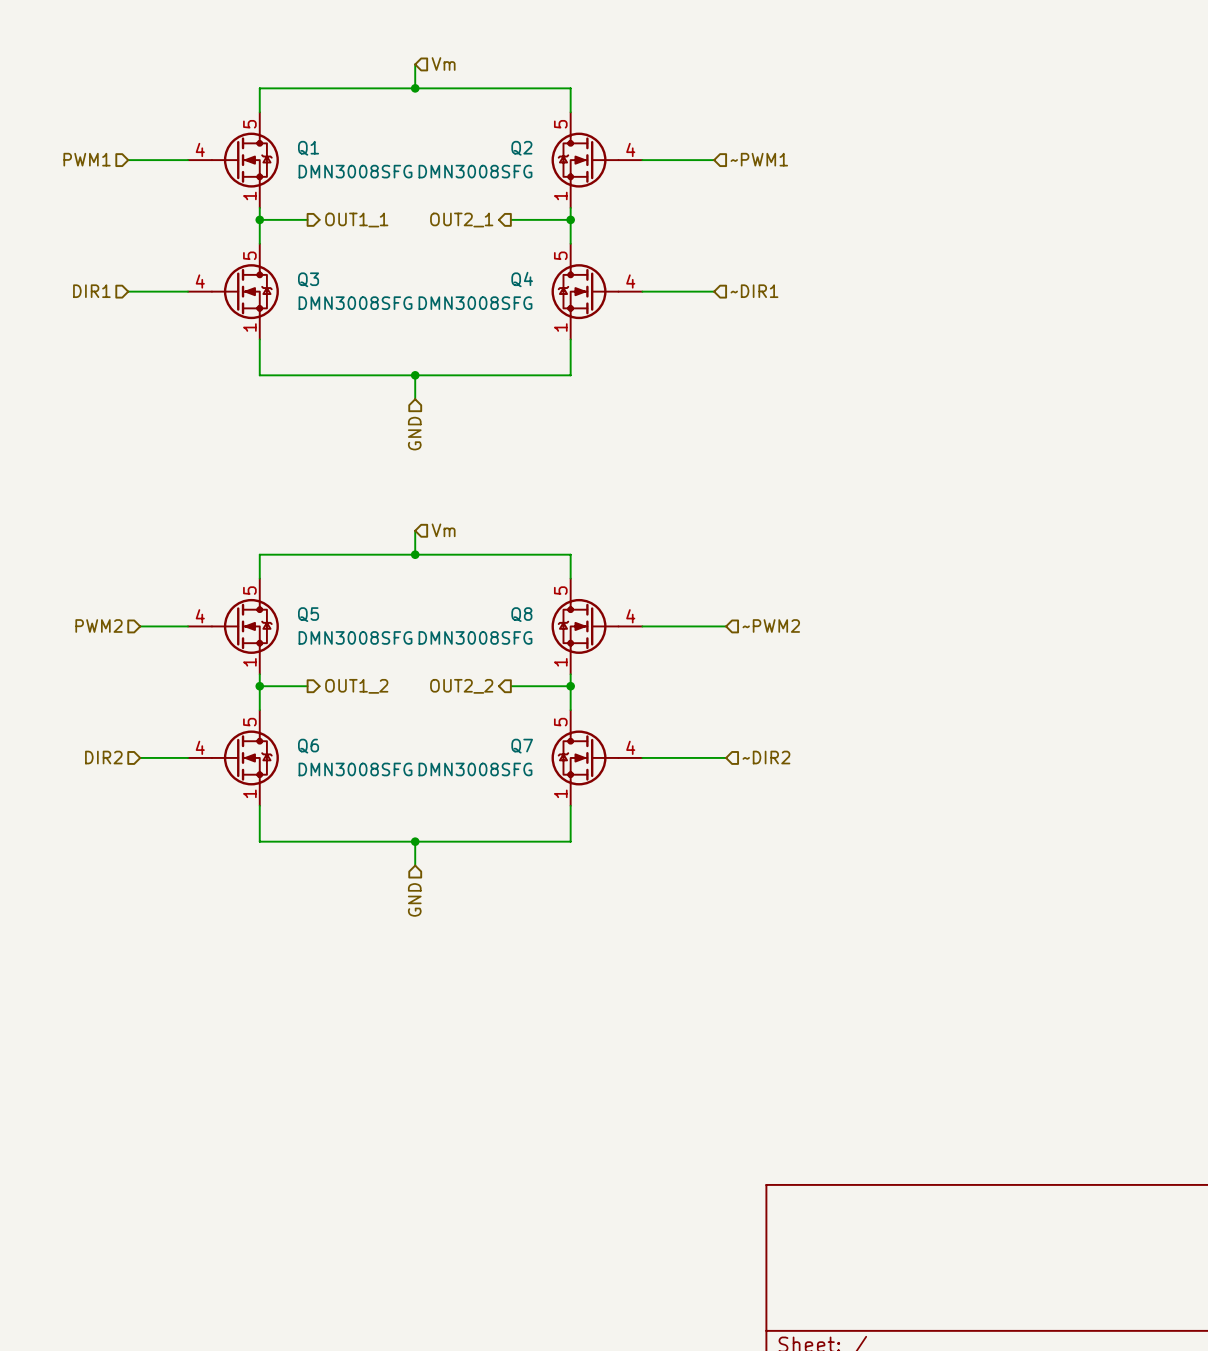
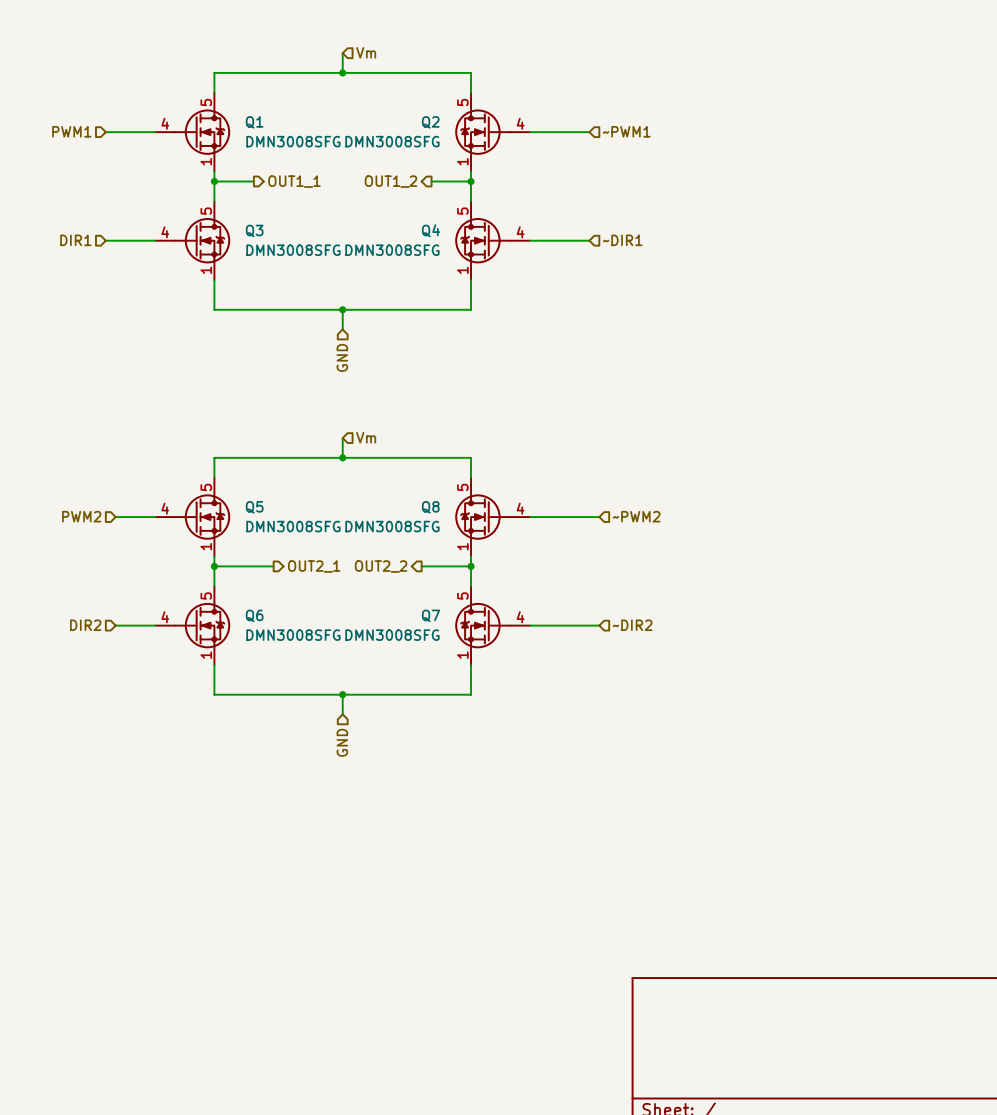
wire: (510, 219) (522, 219) -> none
hierarchical label: OUT2_1 (461, 220) -> OUT1_2 (390, 181)
wire: none -> (253, 566) (273, 566)
hierarchical label: OUT1_2 (356, 686) -> OUT2_1 (314, 566)

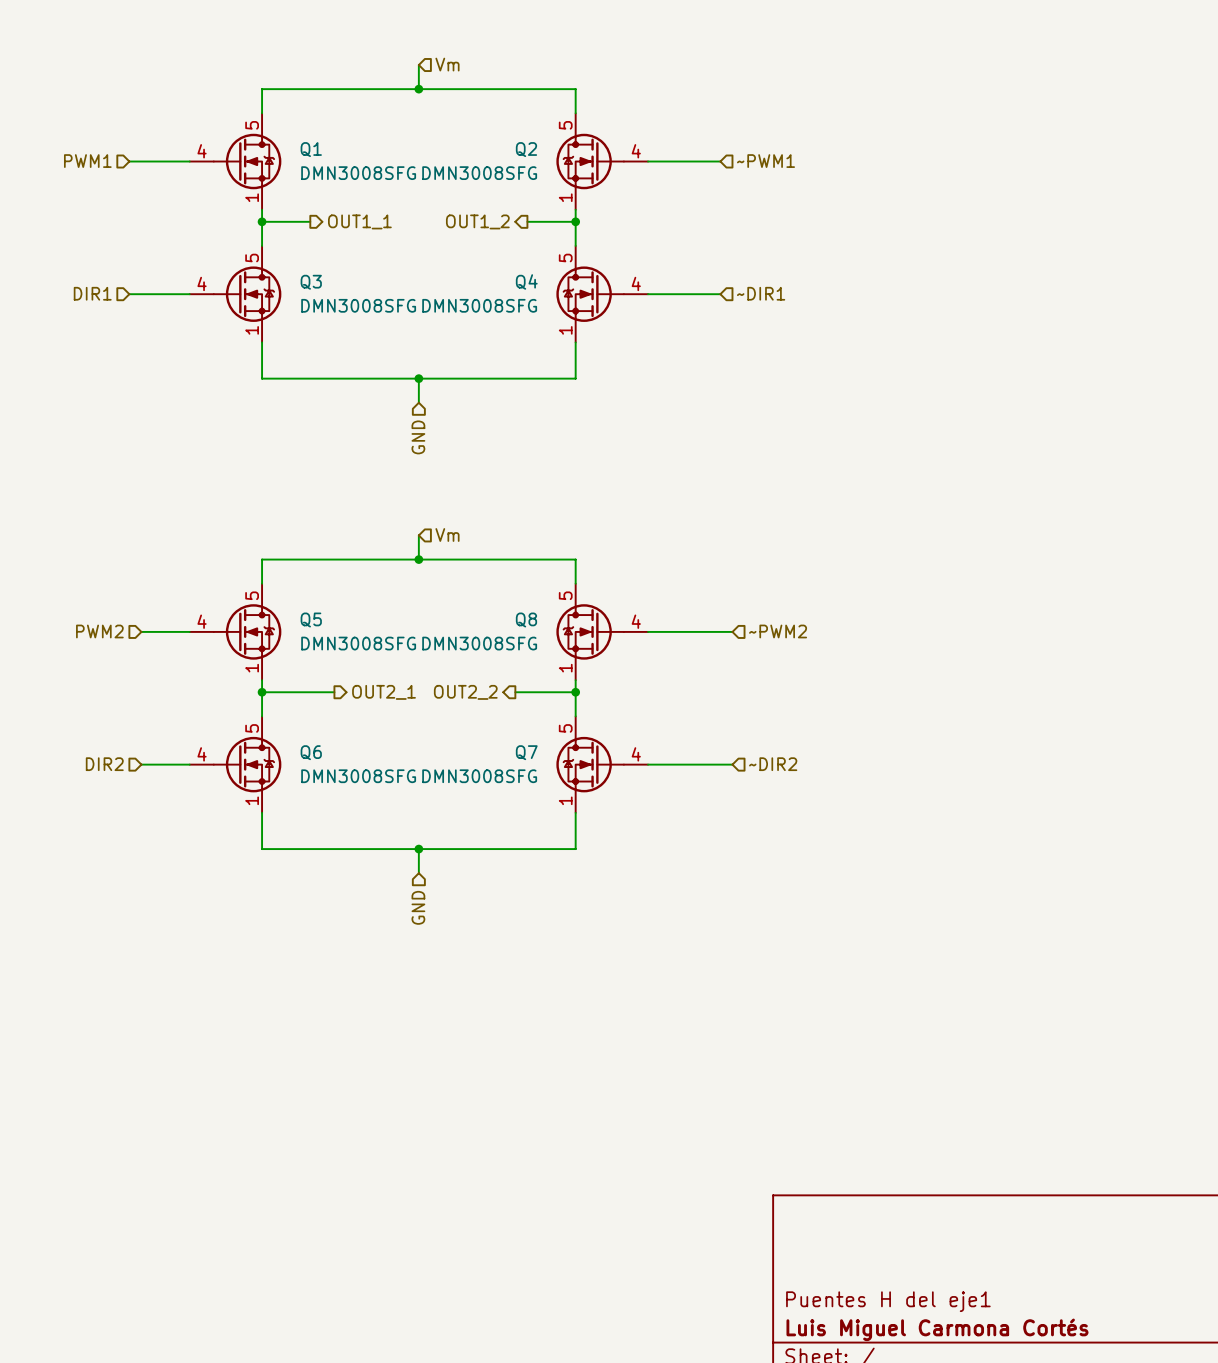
title block: none -> Puentes H del eje1 (888, 1301)
title block: none -> Luis Miguel Carmona Cortés (937, 1329)

